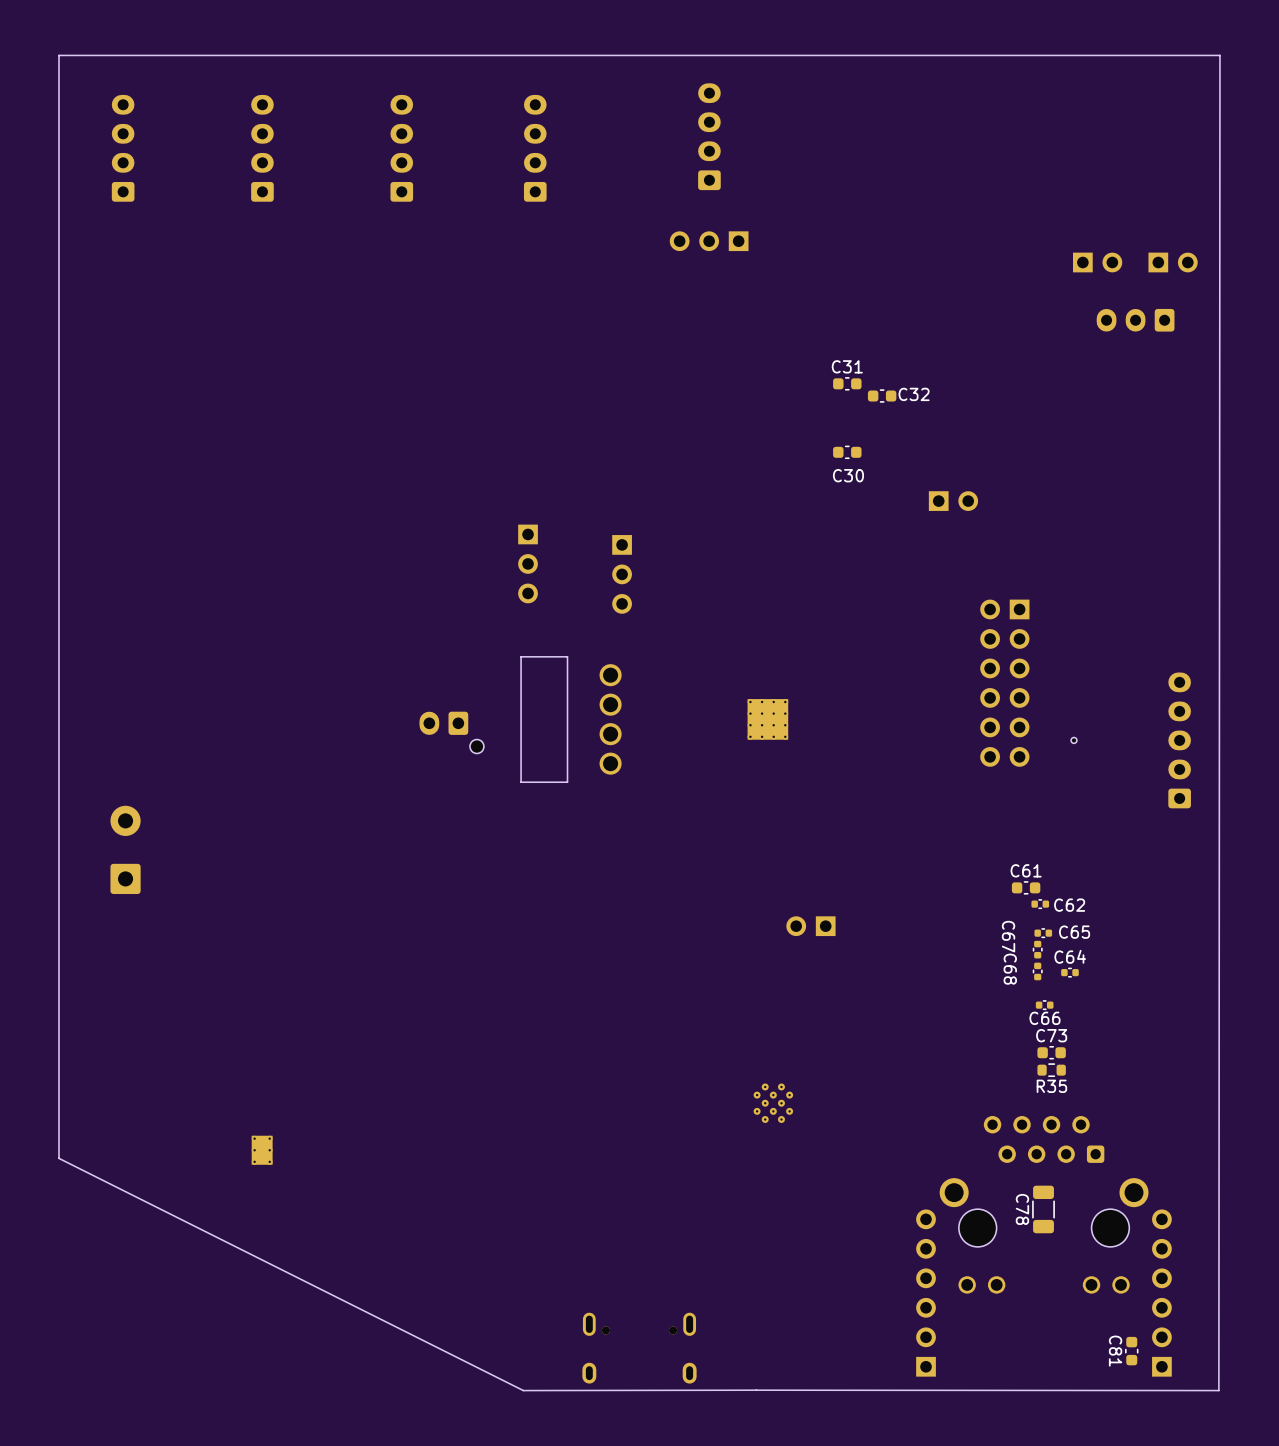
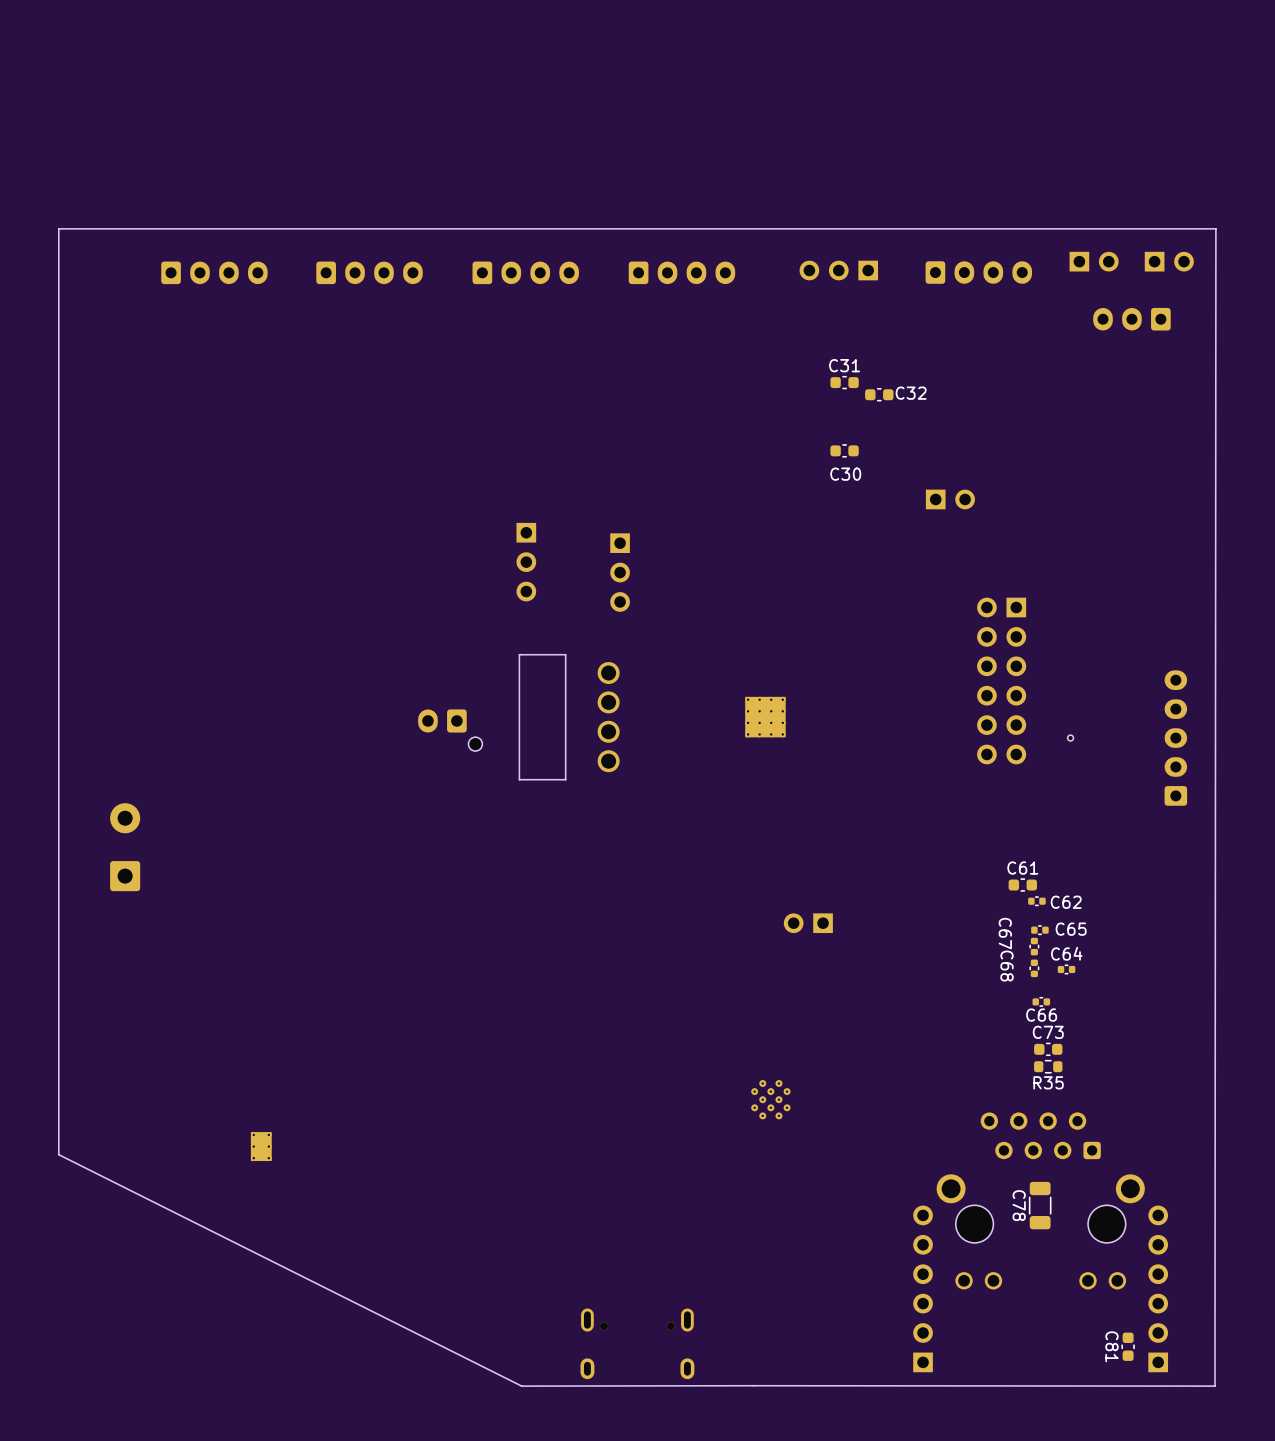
part: (709, 136) -> none
part: (123, 148) -> none
part: (262, 148) -> none
part: (401, 148) -> none
part: (535, 148) -> none
board edge: (1219, 229) (1219, 55) (58, 55) (58, 229) -> (1215, 228) (58, 228)
part position: (709, 241) -> (838, 270)
part: none -> (214, 272)
part: none -> (369, 272)
part: none -> (525, 272)
part: none -> (681, 272)
part: none -> (978, 272)

